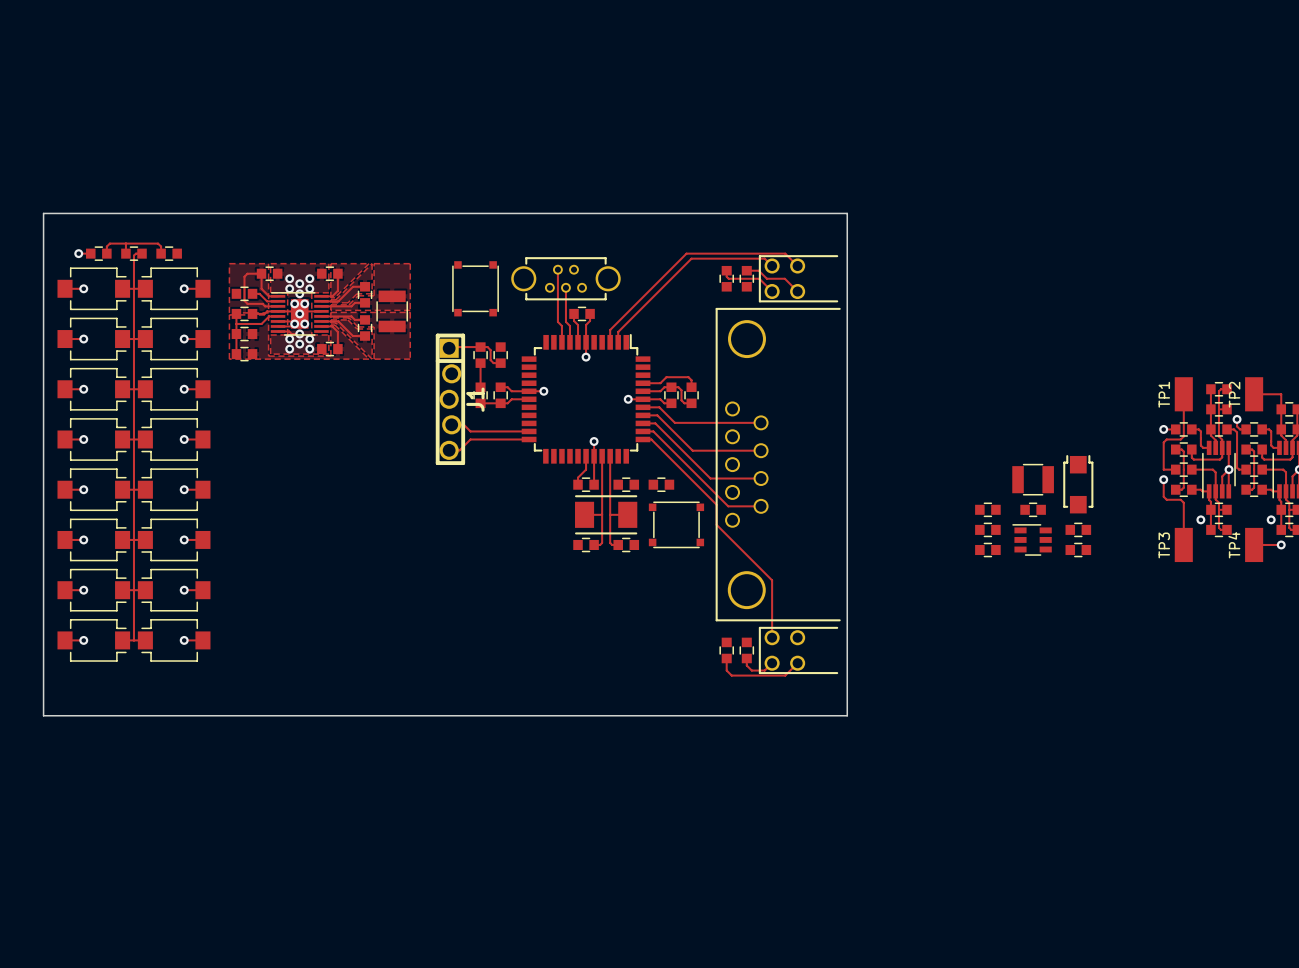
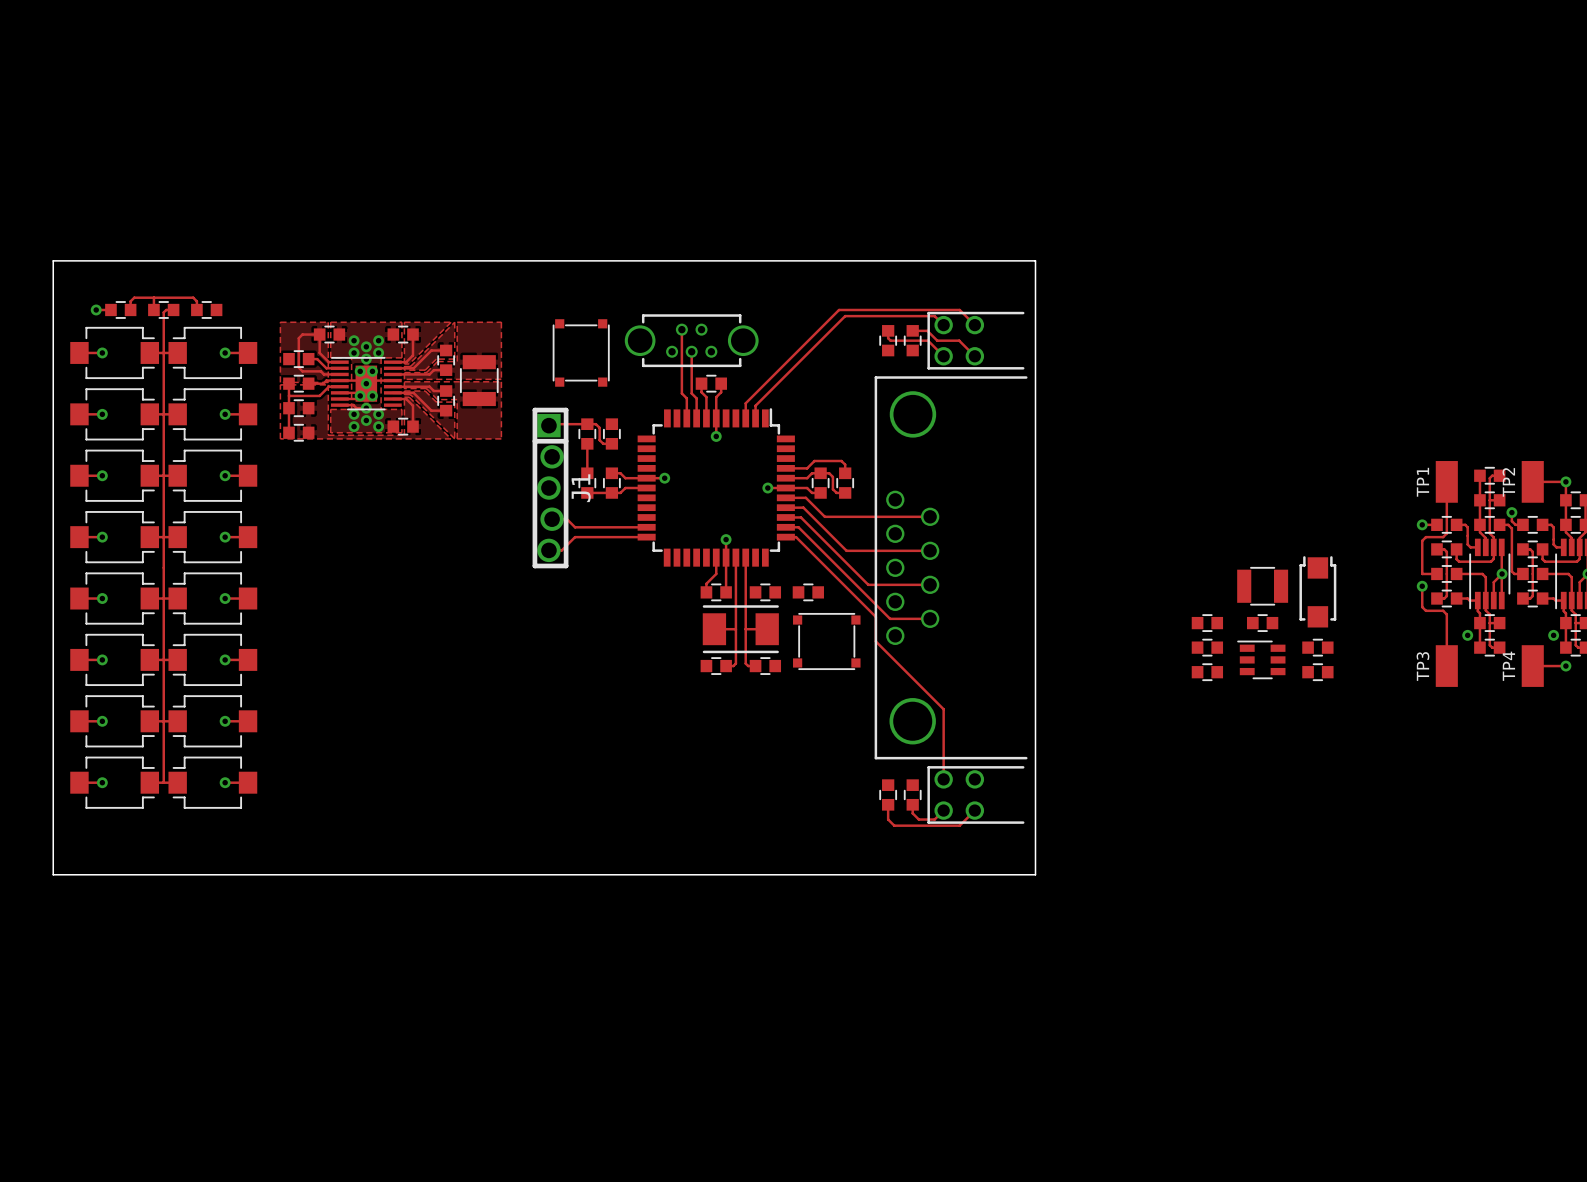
via: none -> (1565, 481)

